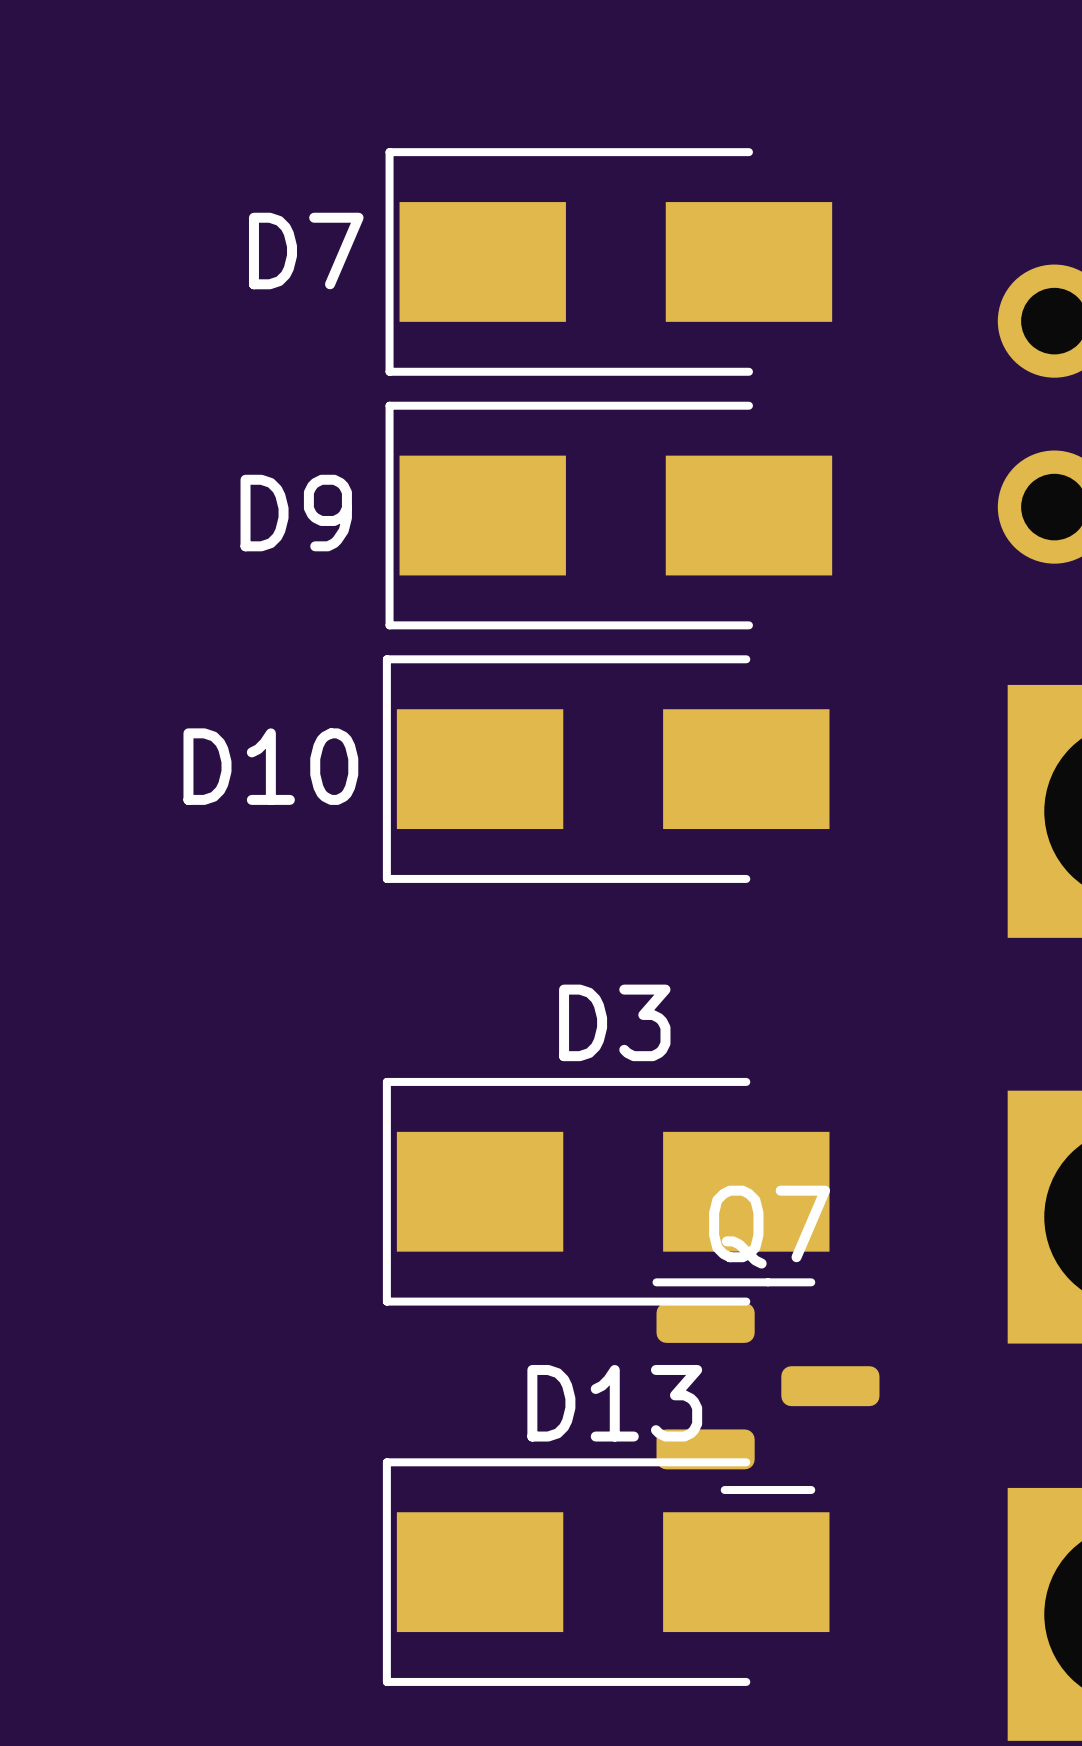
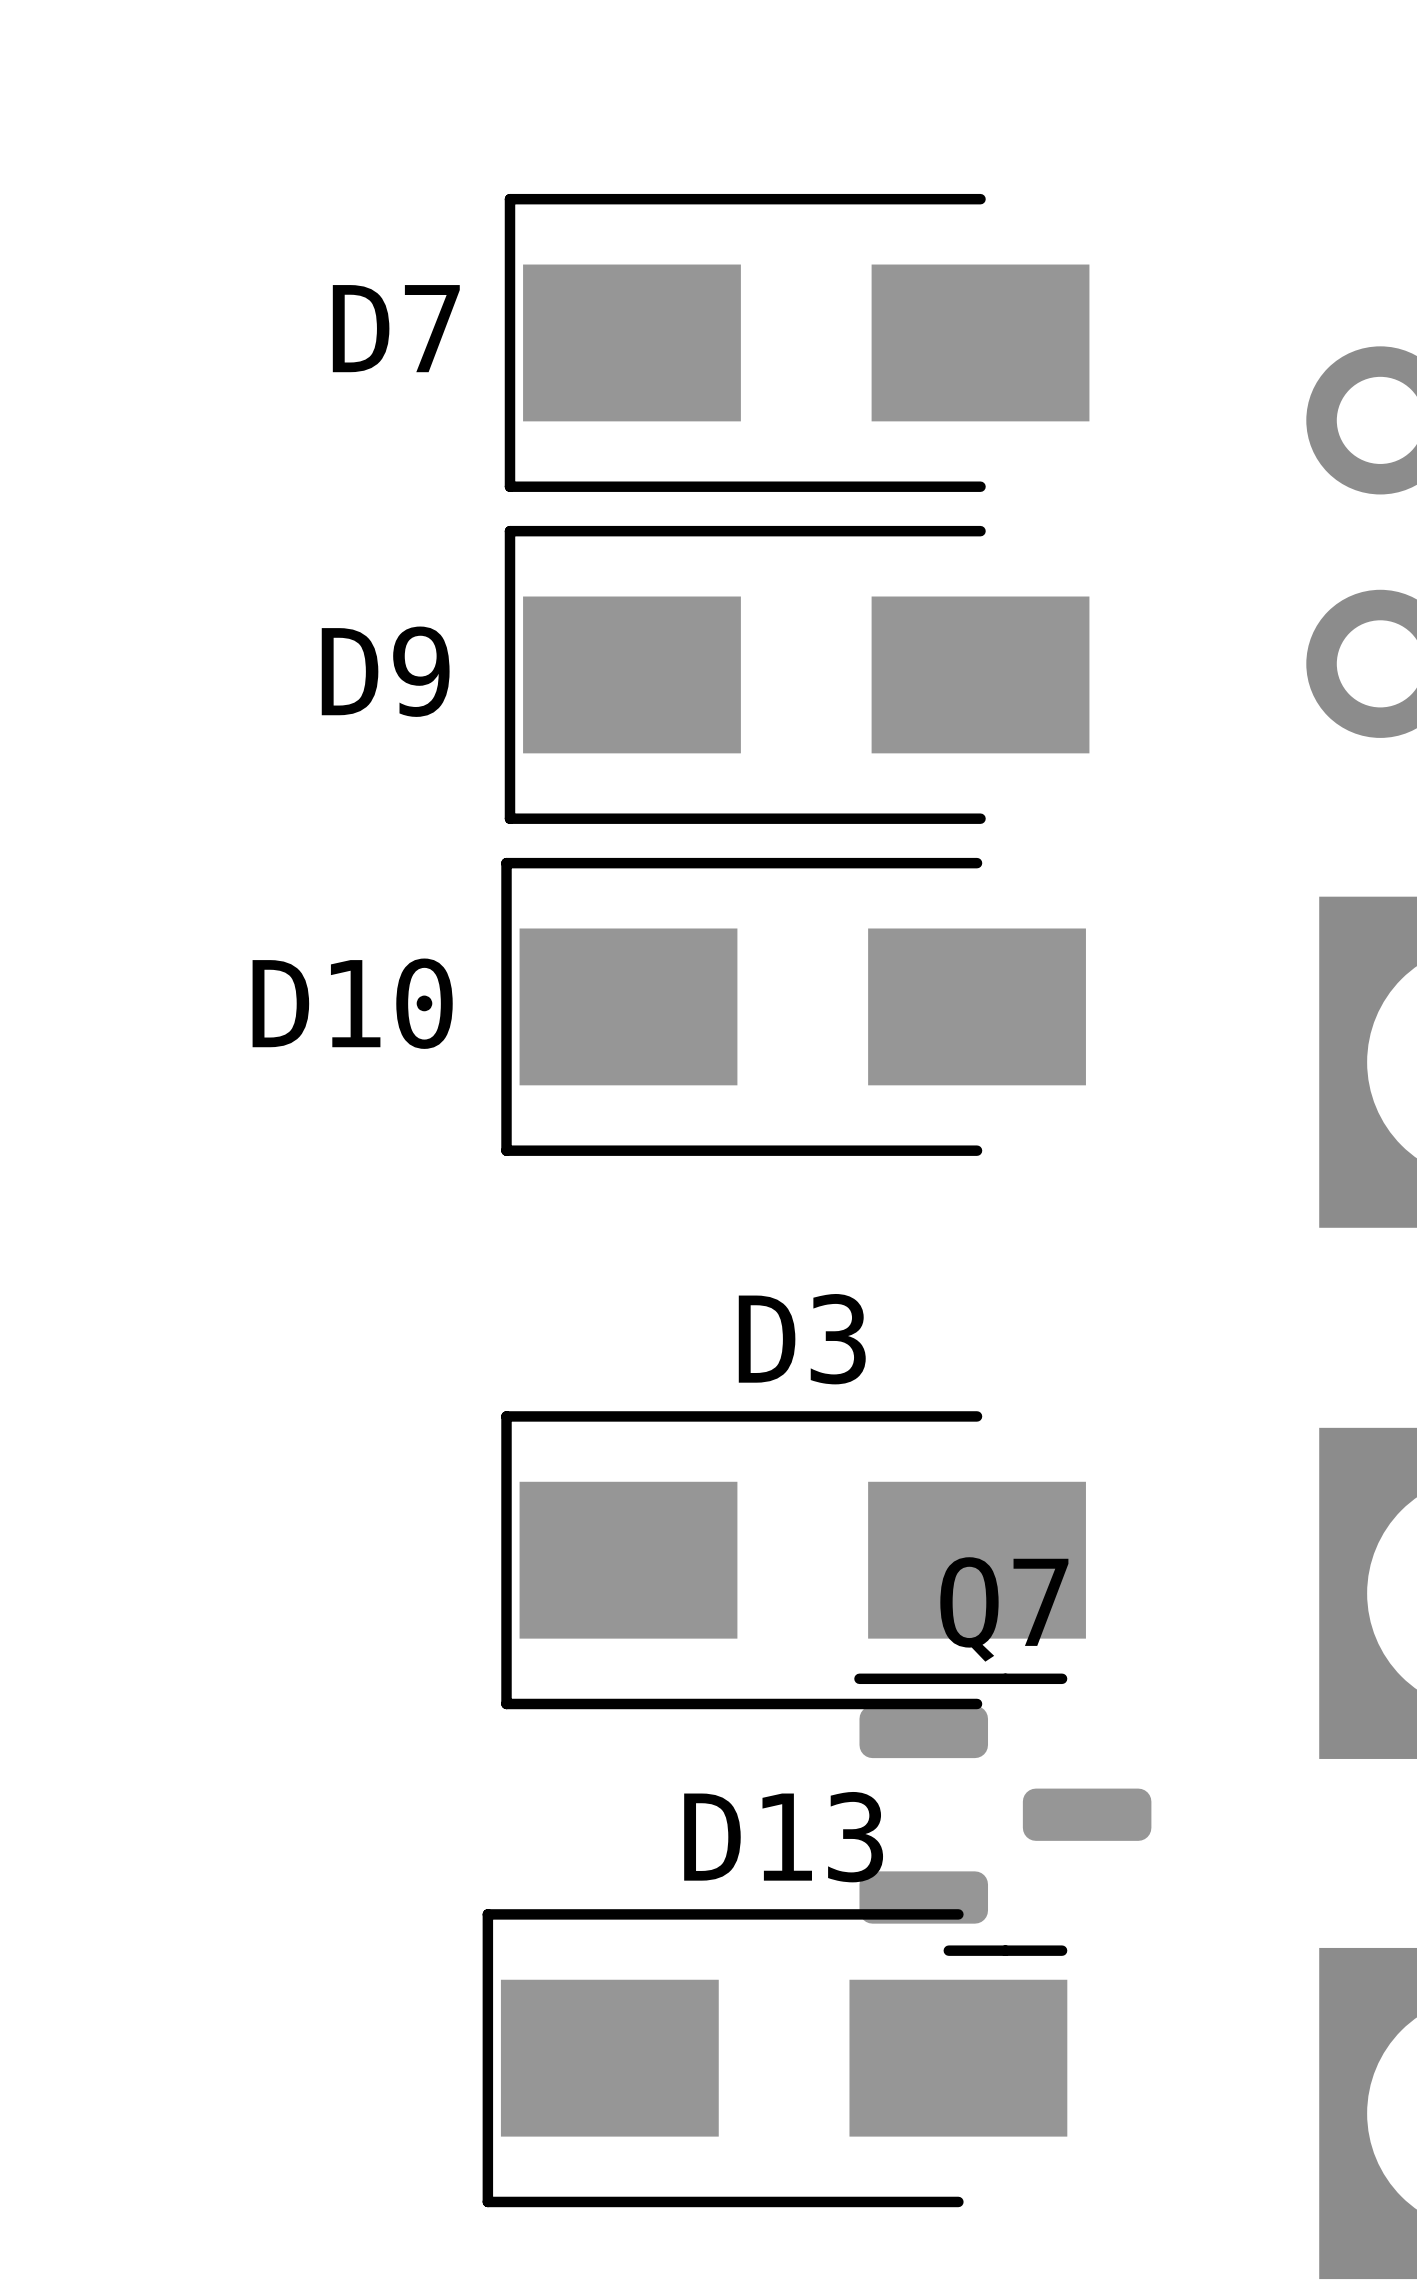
D13 position: (606, 1572) -> (774, 2058)

